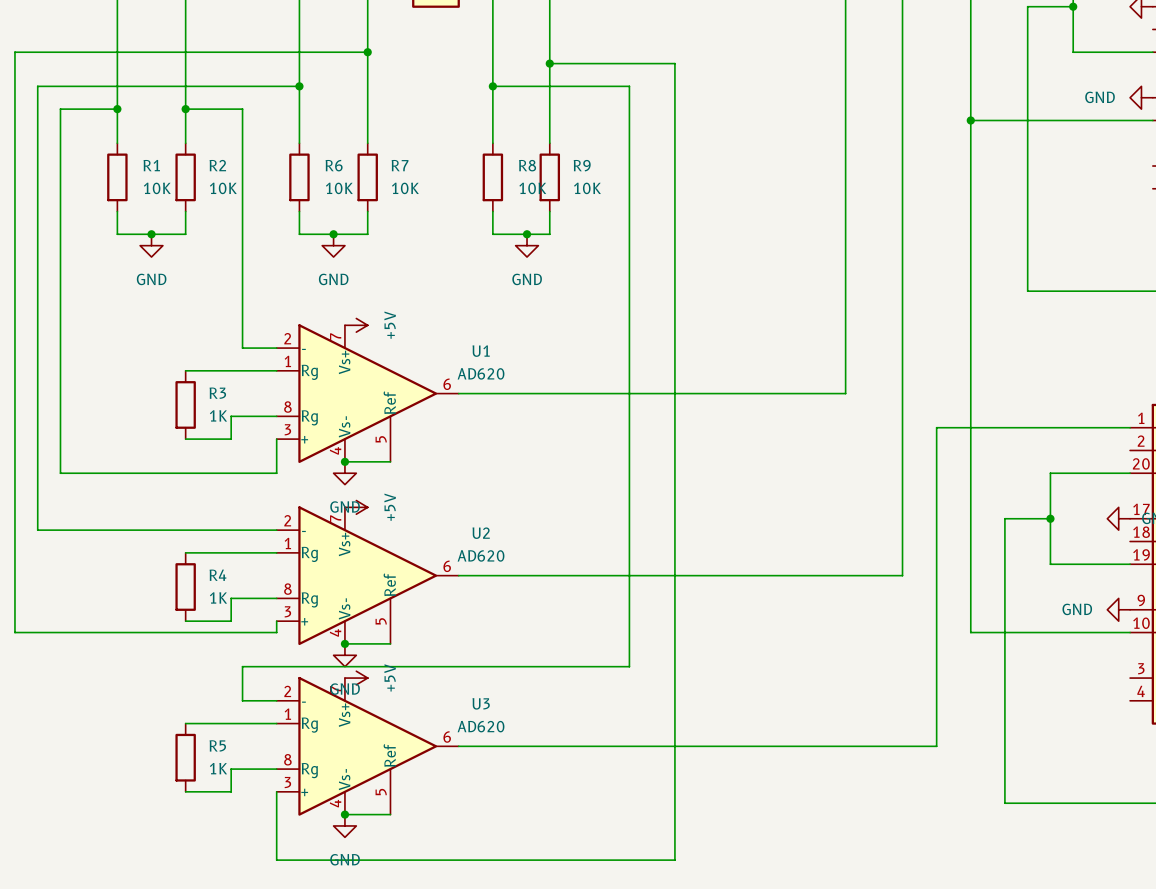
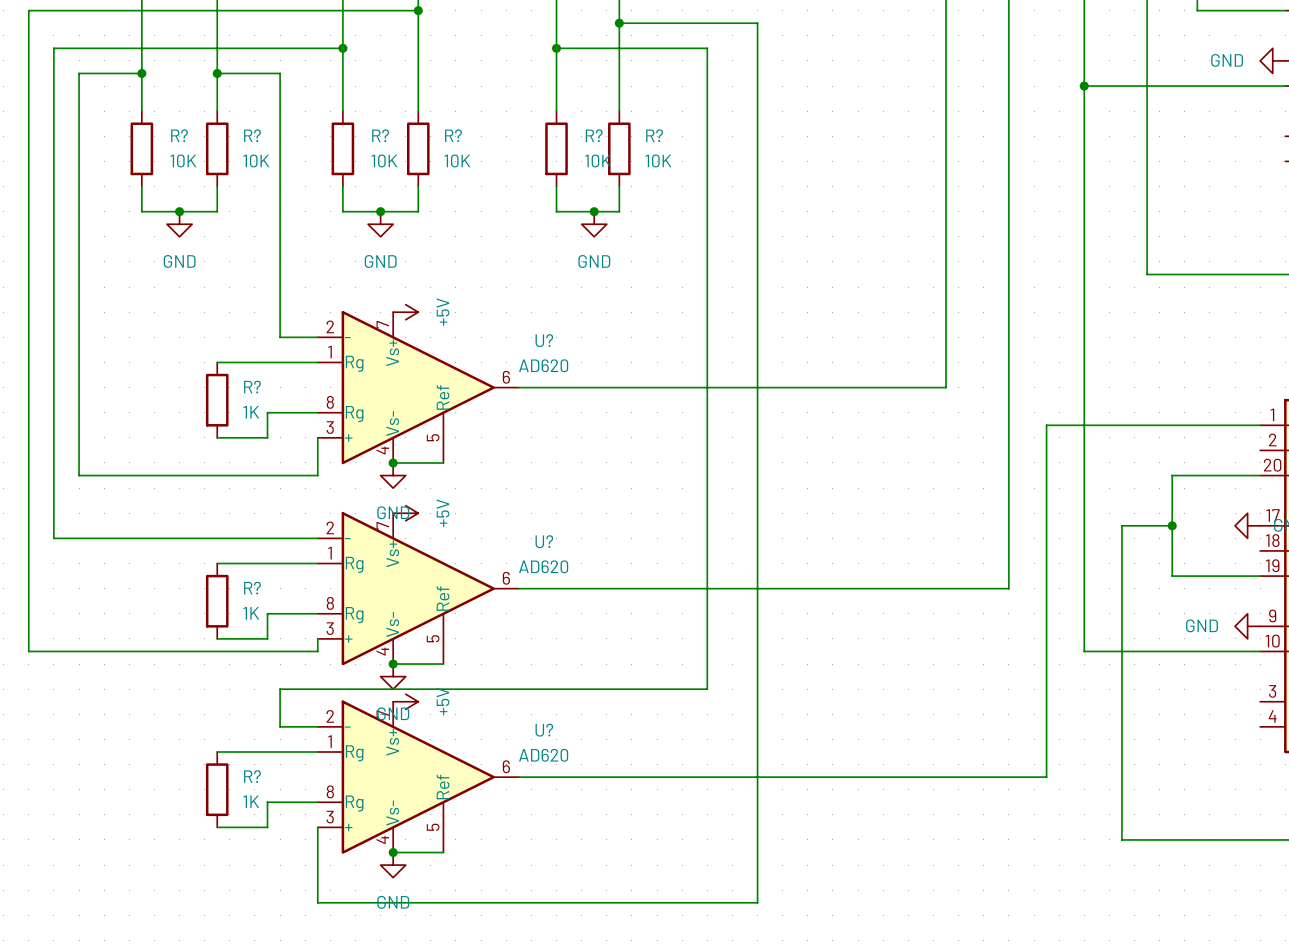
R1 name: R1 (151, 165) -> R? (179, 135)
R2 name: R2 (217, 165) -> R? (252, 135)
R6 name: R6 (334, 165) -> R? (380, 135)
R7 name: R7 (400, 165) -> R? (453, 135)
R8 name: R8 (527, 165) -> R? (594, 135)
R9 name: R9 (582, 165) -> R? (654, 135)
U1 name: U1 (481, 351) -> U? (544, 340)
R3 name: R3 (217, 393) -> R? (252, 387)
U2 name: U2 (481, 533) -> U? (544, 541)
R4 name: R4 (217, 575) -> R? (252, 588)
U3 name: U3 (481, 703) -> U? (544, 730)
R5 name: R5 (217, 745) -> R? (252, 776)

